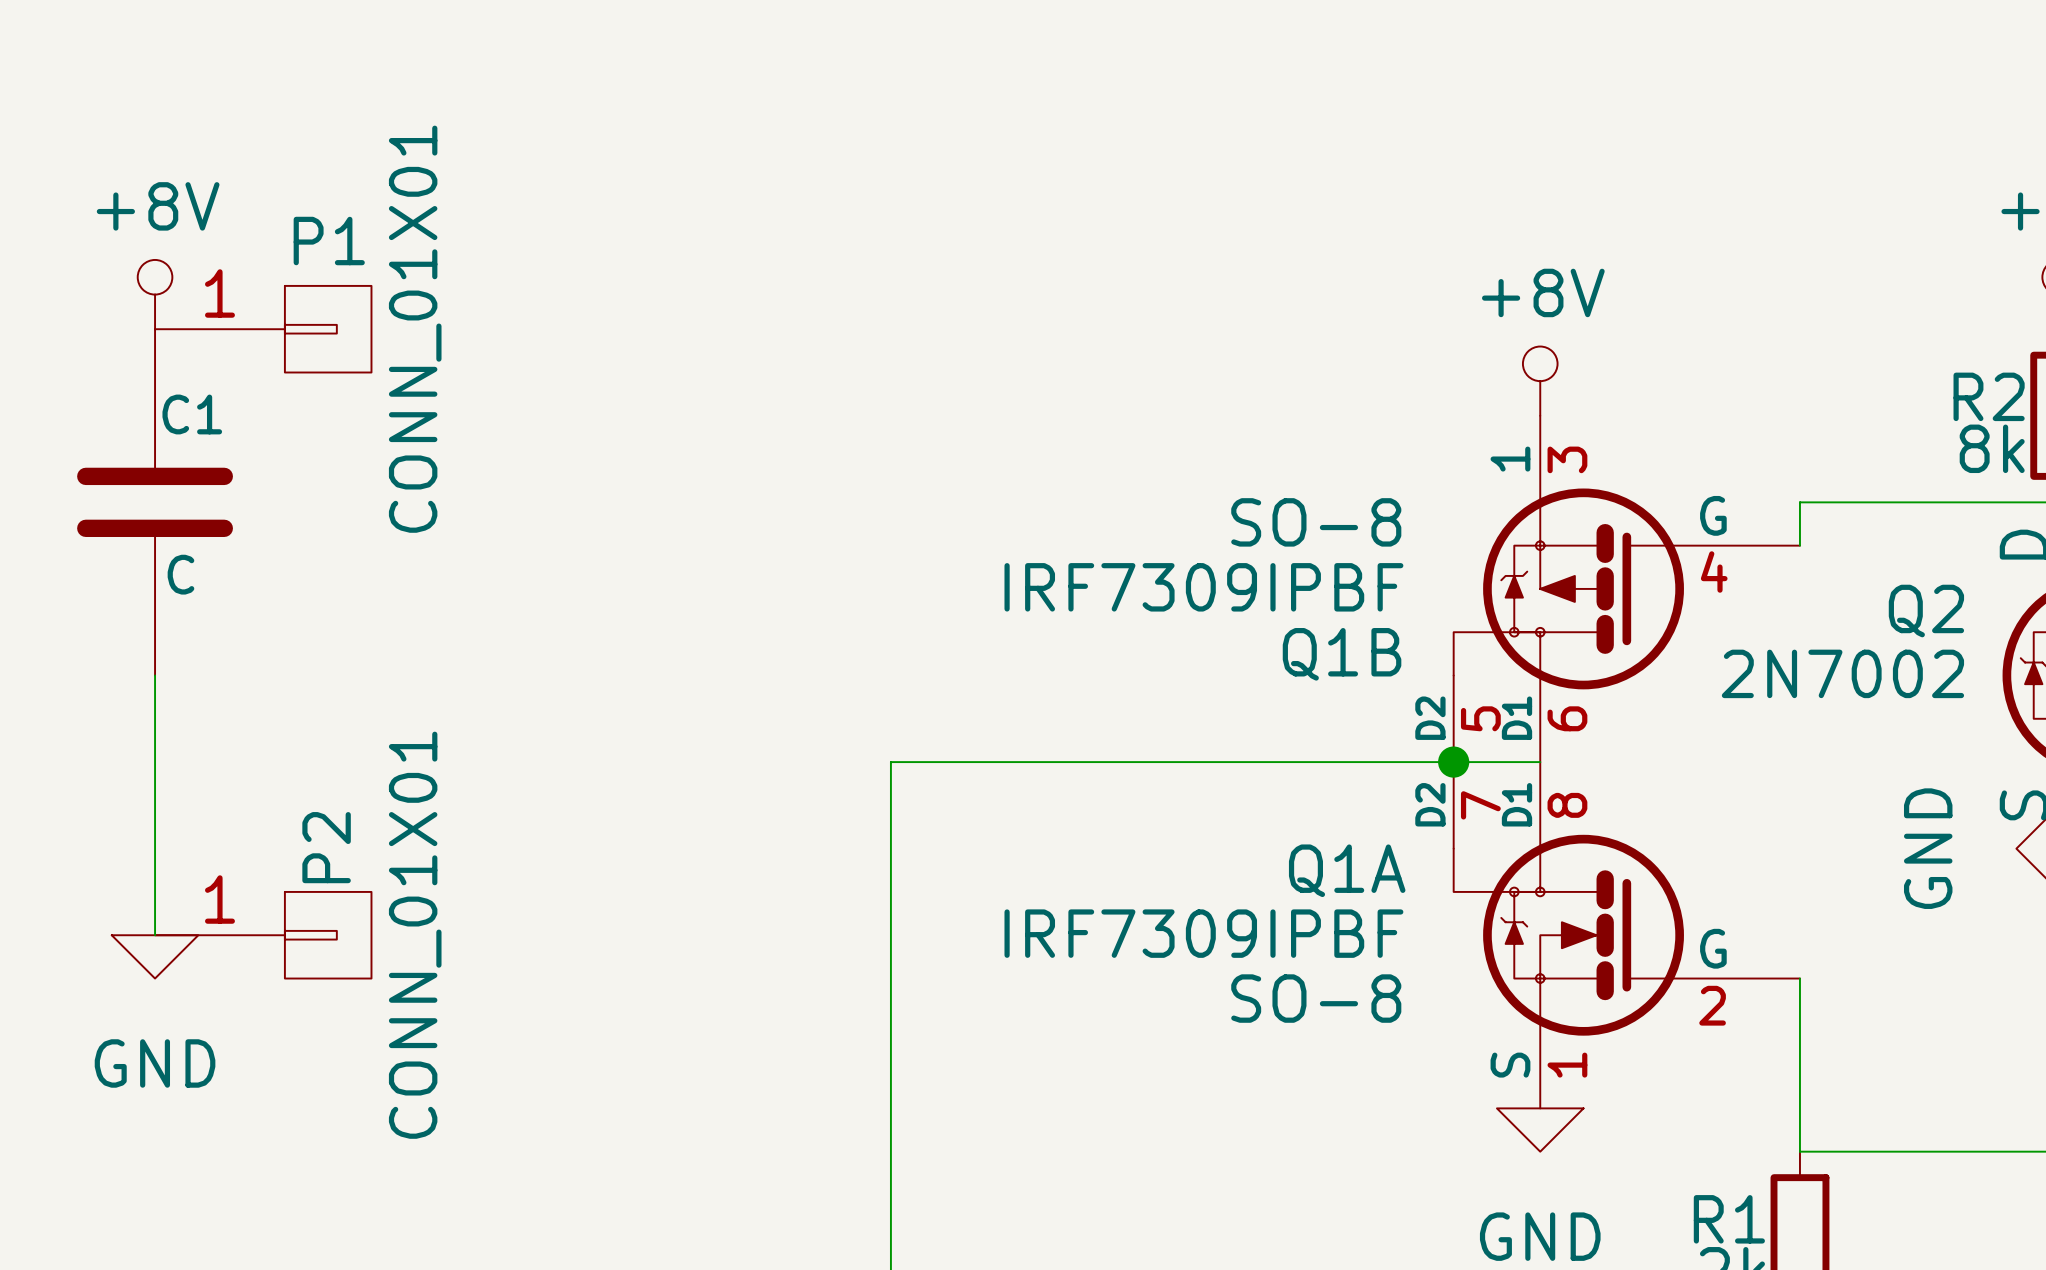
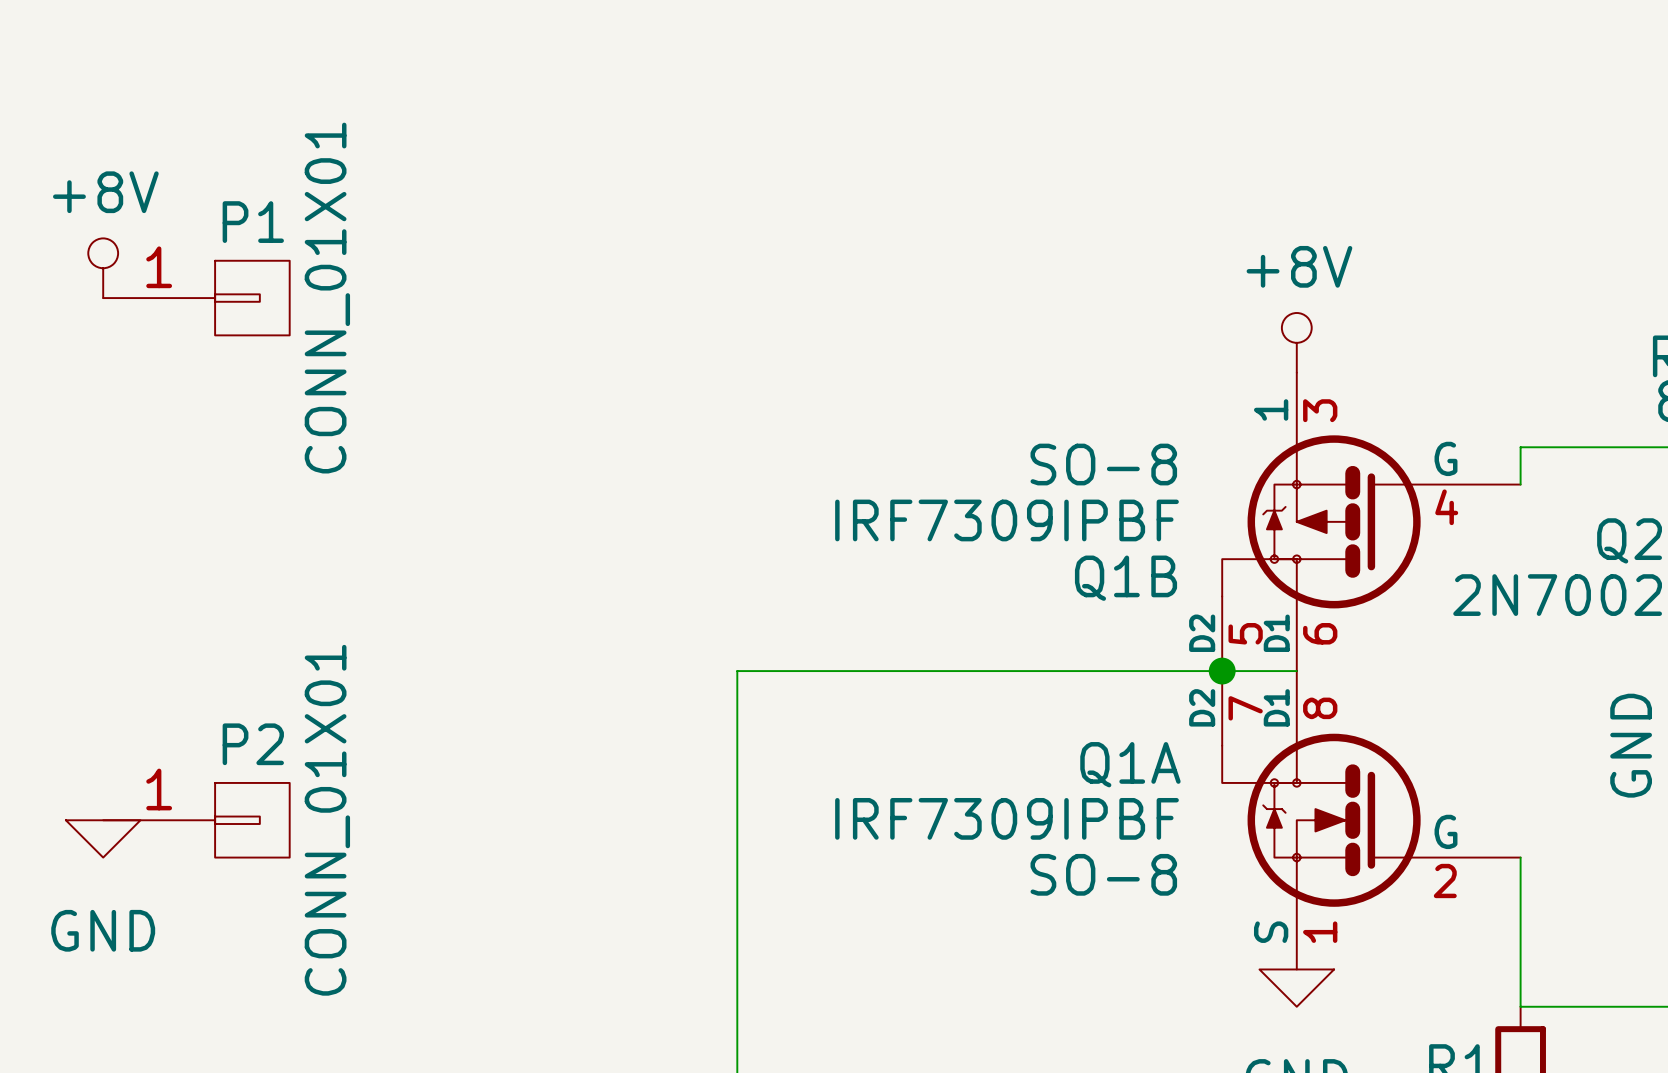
C1: C (155, 502) -> none
wire: (155, 675) (155, 935) -> none
P2 name rotation: 0° (326, 847) -> 90° clockwise (253, 744)

